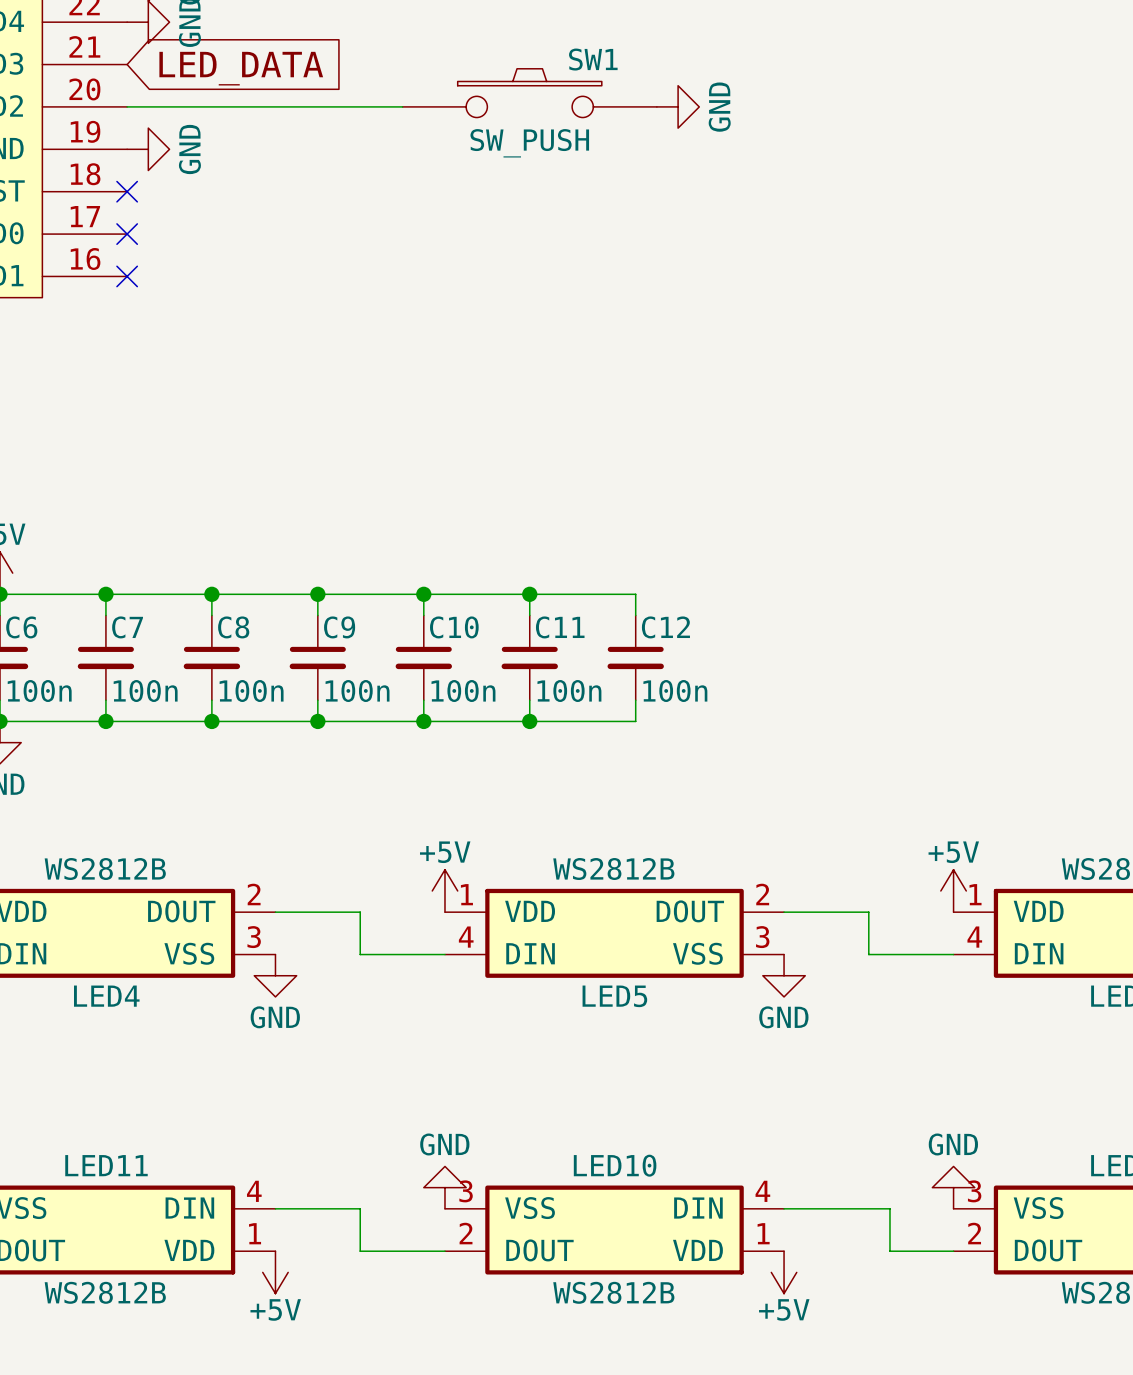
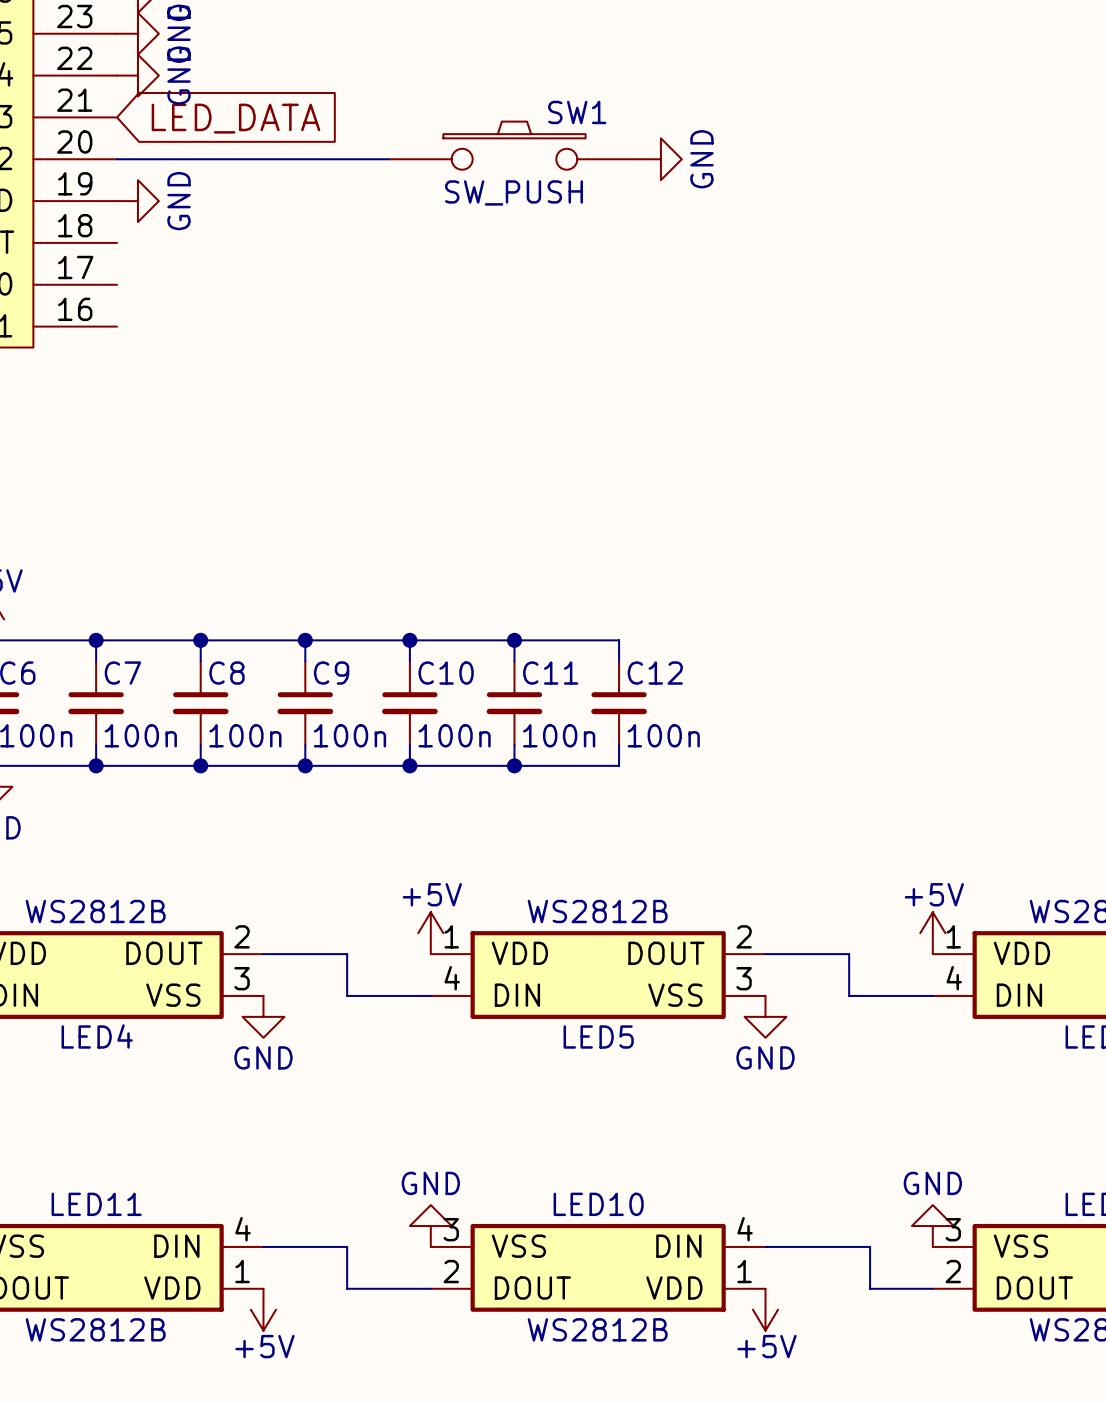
no-connect mark: (127, 191) -> none
no-connect mark: (127, 234) -> none
no-connect mark: (127, 276) -> none

